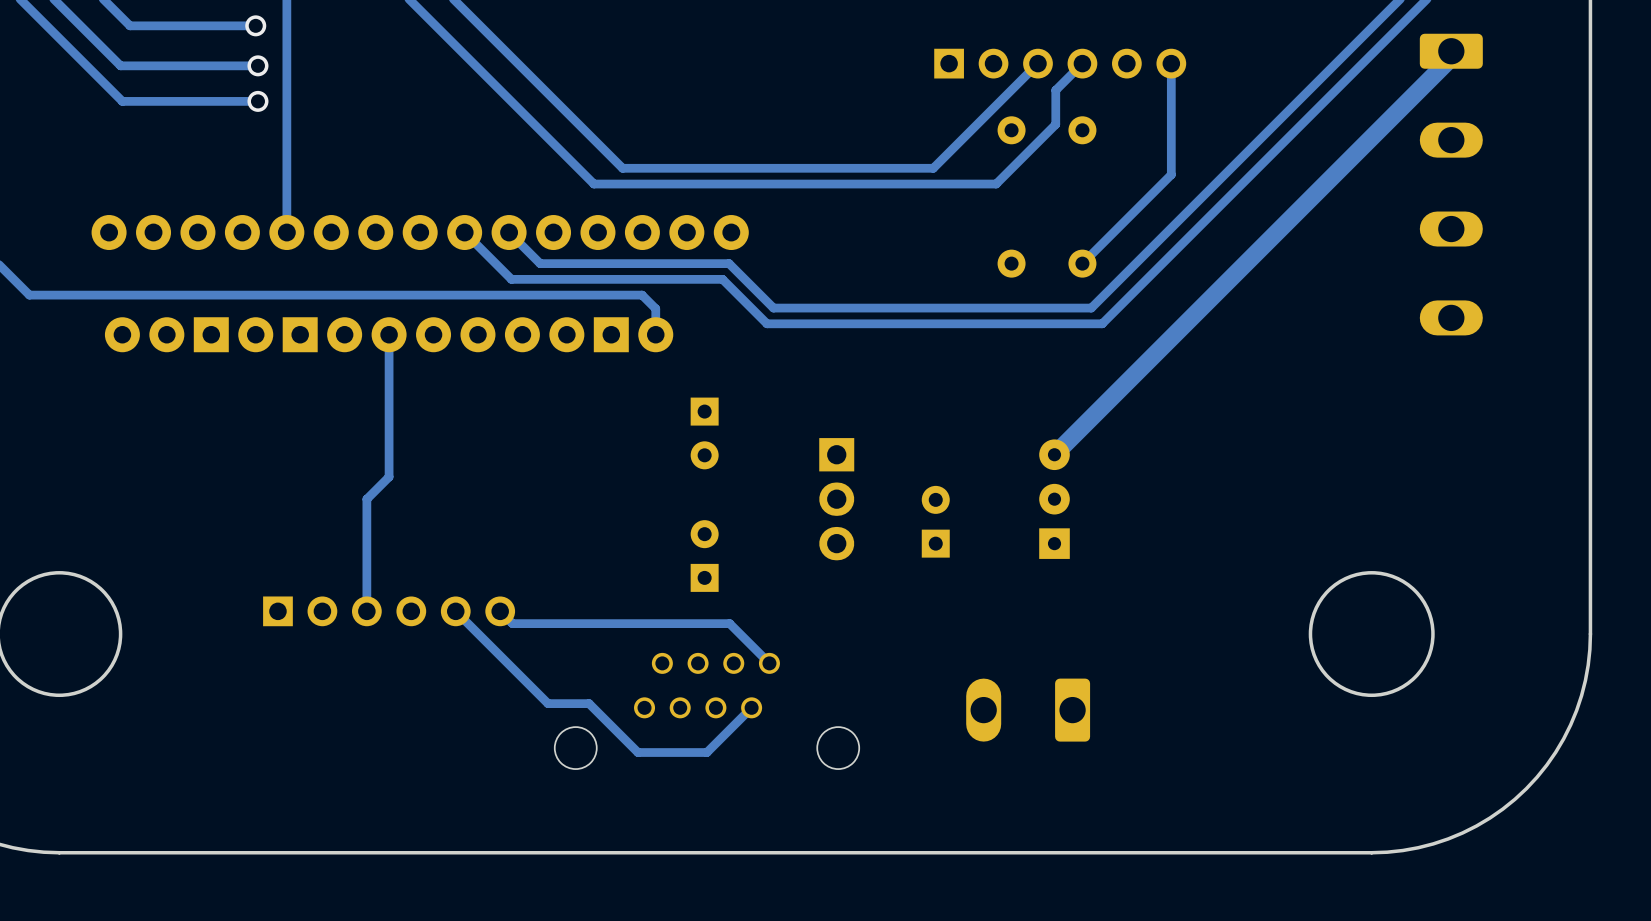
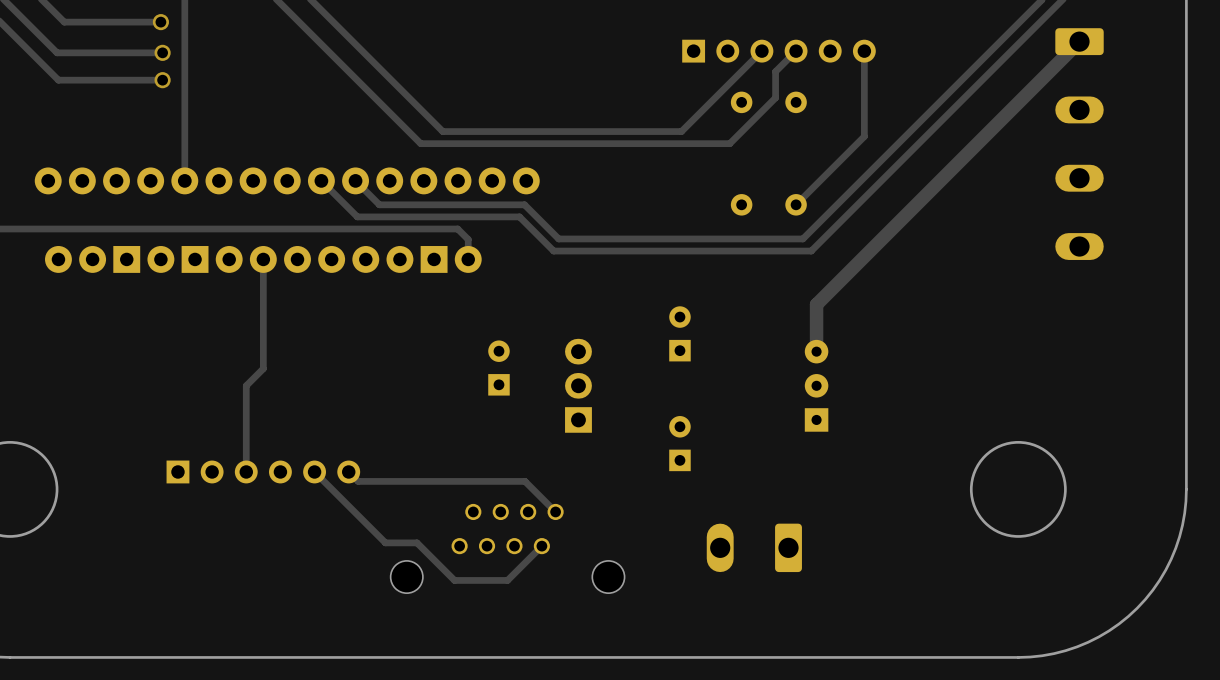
track: (1451, 51) (1451, 57) (1054, 454) -> (1079, 41) (816, 304) (816, 351)
part: none -> (679, 333)
part: (704, 433) -> none
part: none -> (498, 368)
part rotation: 0° (836, 499) -> 180° (578, 385)
part position: (1054, 499) -> (816, 385)
part: (935, 521) -> none
part: (704, 556) -> none
part: none -> (679, 443)

